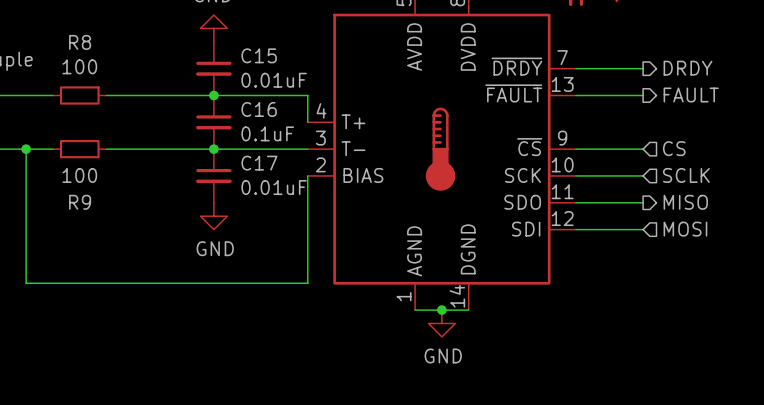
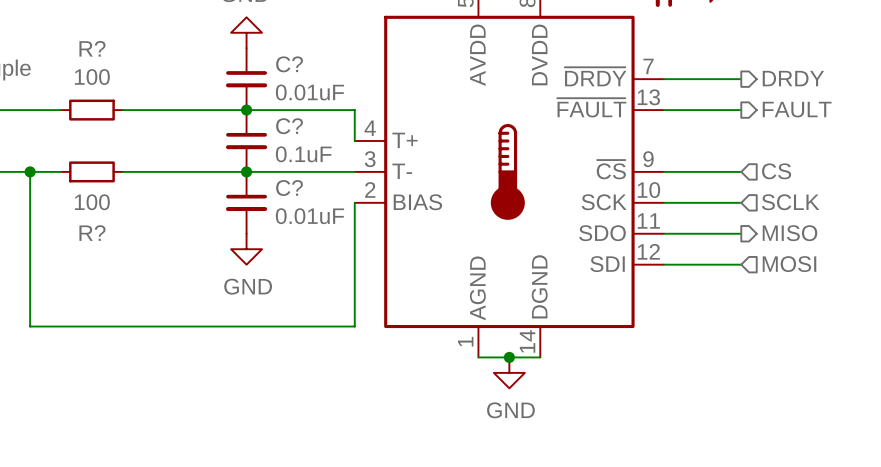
R8 name: R8 (80, 42) -> R? (92, 48)
C15 name: C15 (259, 55) -> C? (289, 64)
C16 name: C16 (259, 109) -> C? (289, 126)
C17 name: C17 (259, 163) -> C? (289, 188)
R9 name: R9 (80, 202) -> R? (92, 233)

